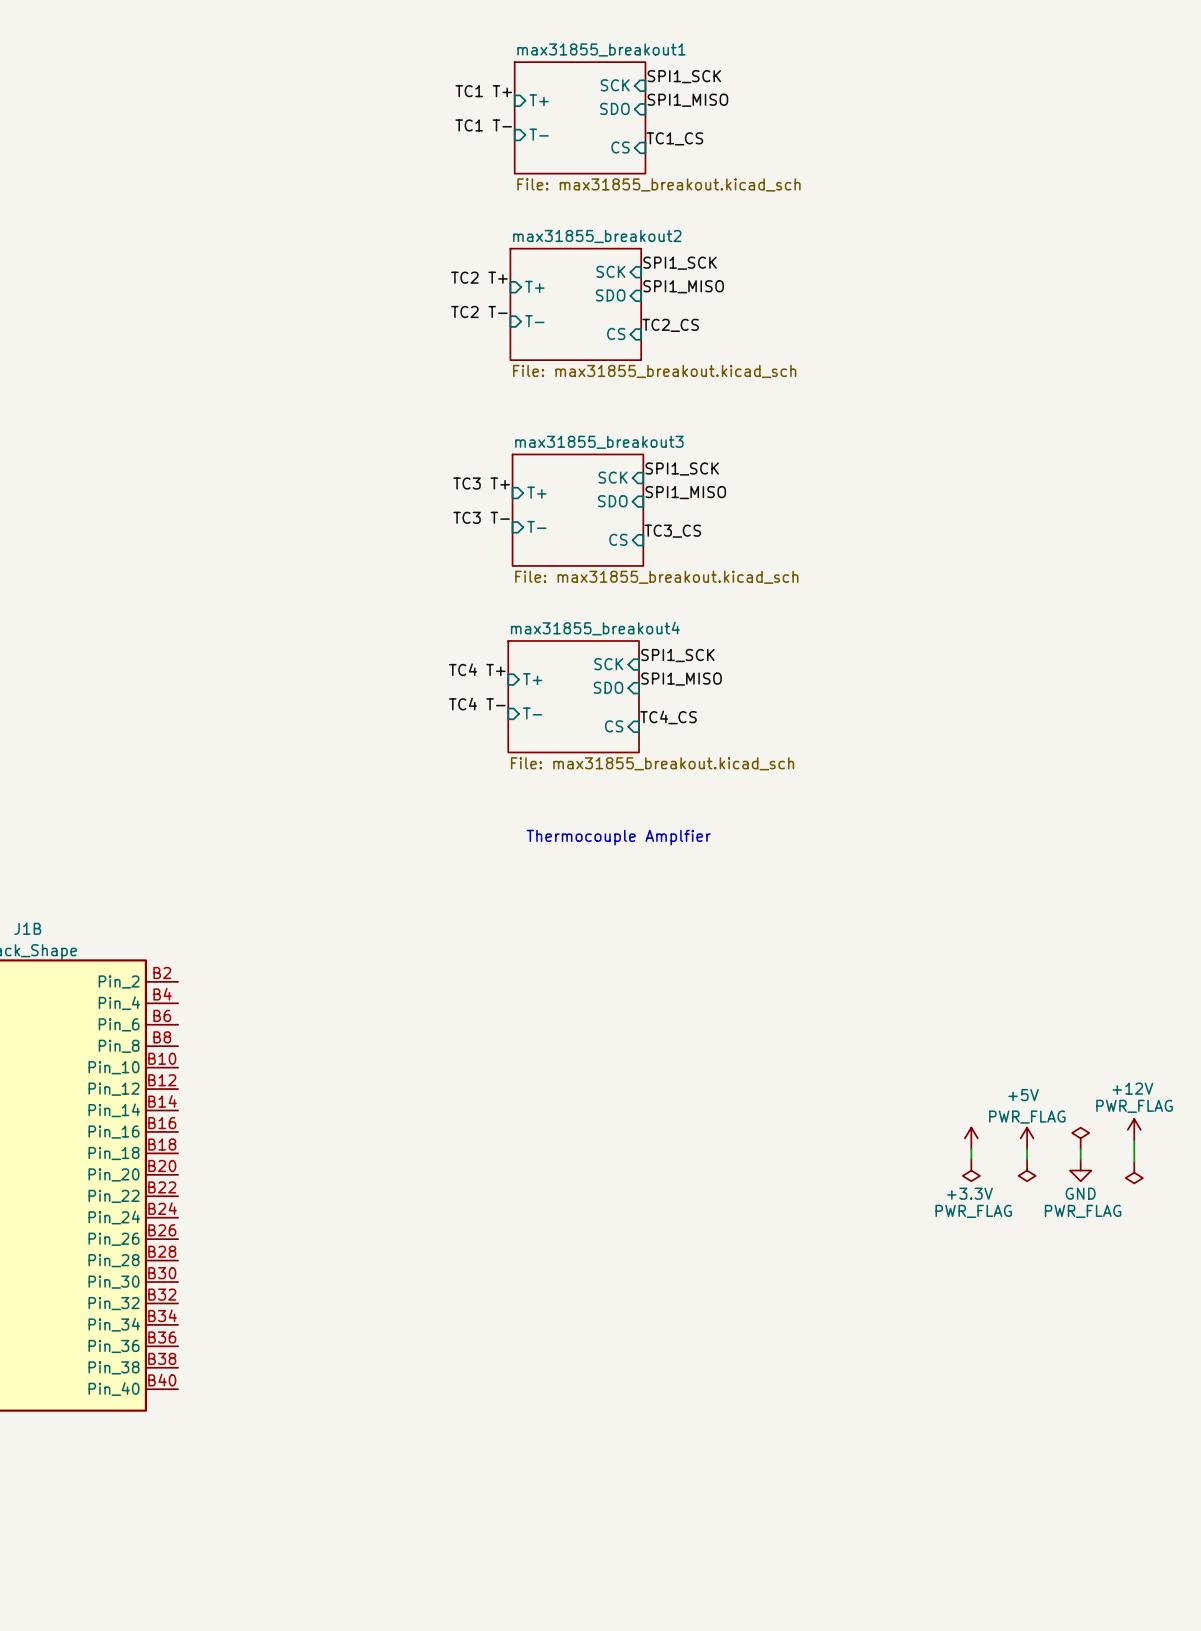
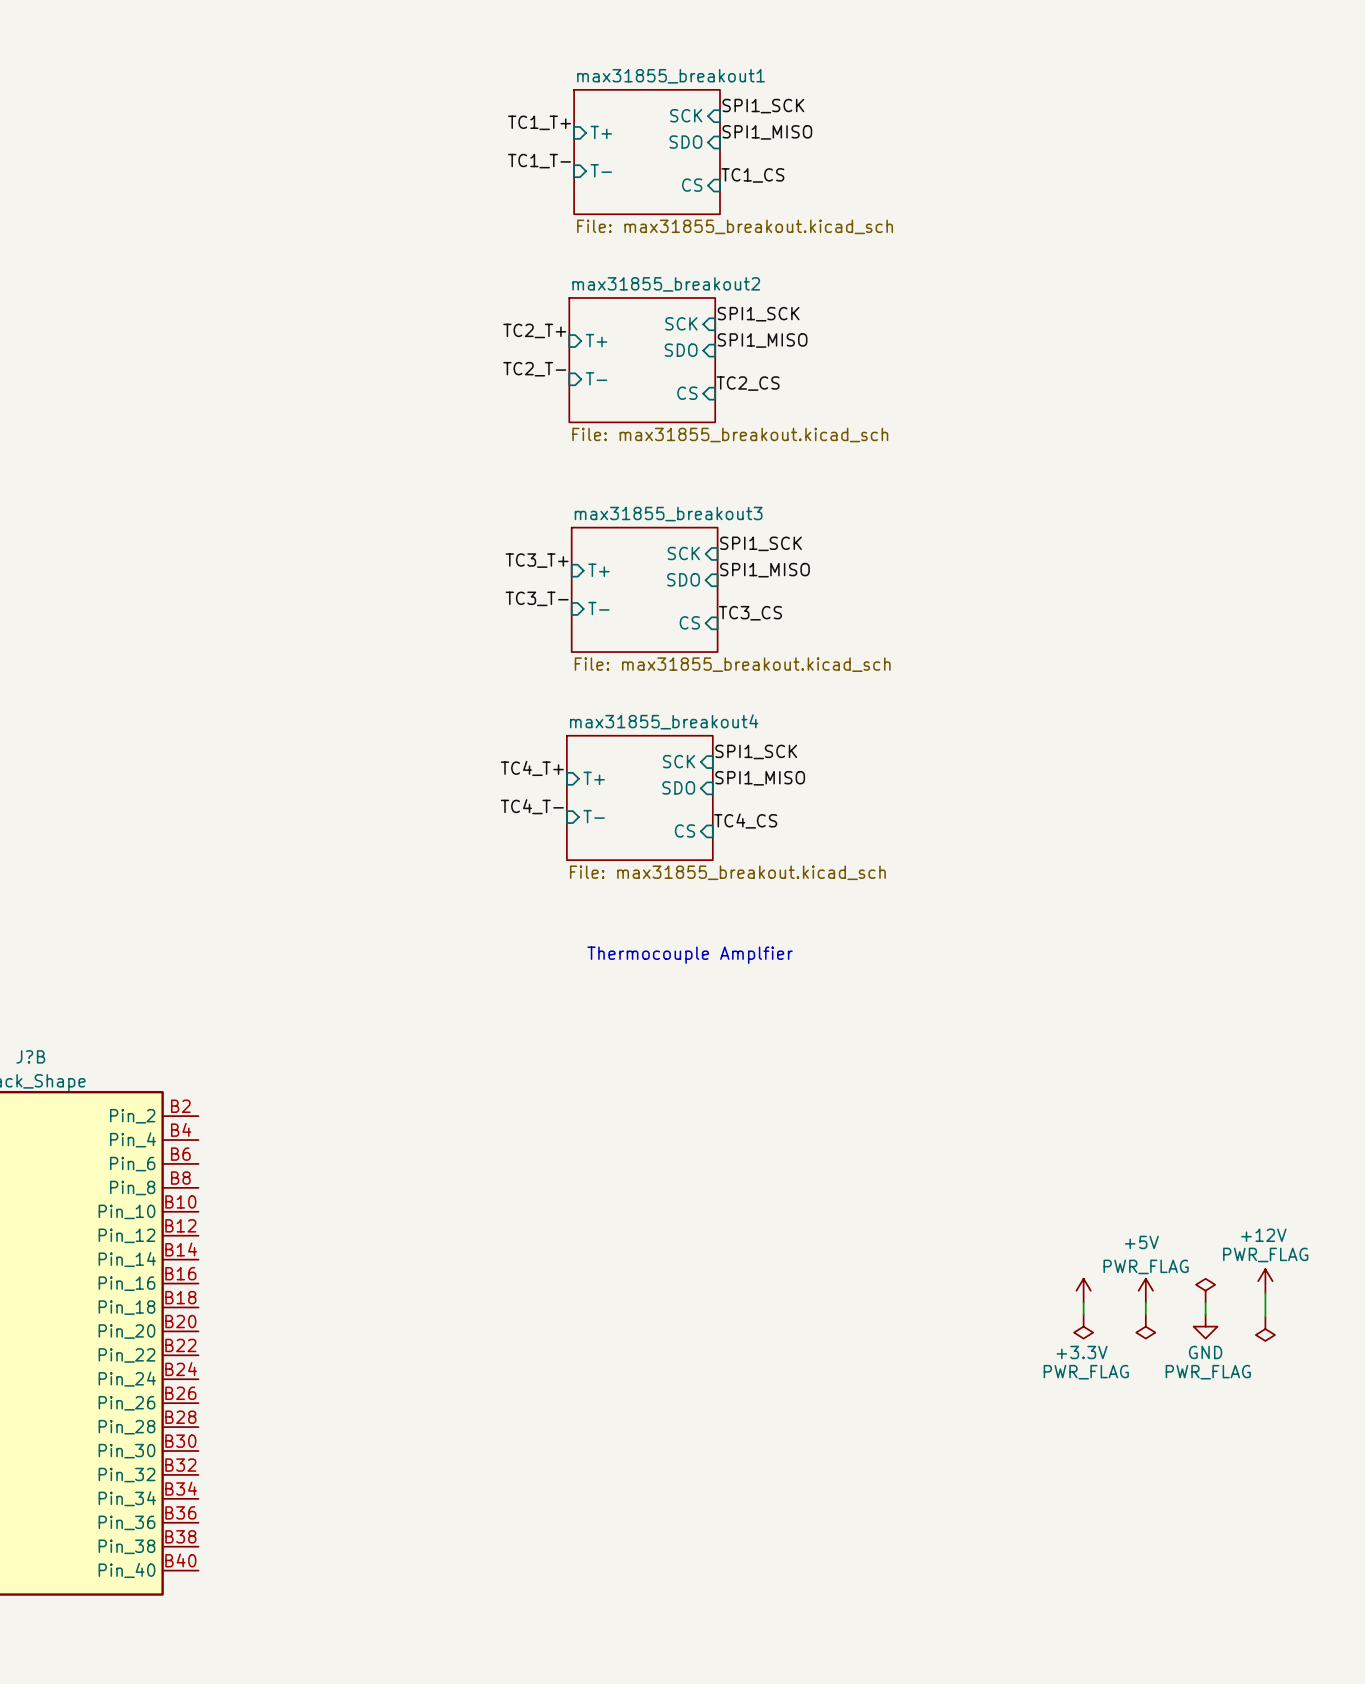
label: TC1 T+ (483, 91) -> TC1_T+ (539, 122)
label: TC1 T- (483, 125) -> TC1_T- (539, 161)
label: TC2 T+ (479, 277) -> TC2_T+ (534, 330)
label: TC2 T- (479, 311) -> TC2_T- (534, 369)
label: TC3 T+ (481, 483) -> TC3_T+ (537, 560)
label: TC3 T- (481, 517) -> TC3_T- (537, 598)
label: TC4 T+ (477, 669) -> TC4_T+ (532, 768)
label: TC4 T- (477, 704) -> TC4_T- (532, 806)
J1B name: J1B (27, 928) -> J?B (30, 1056)

